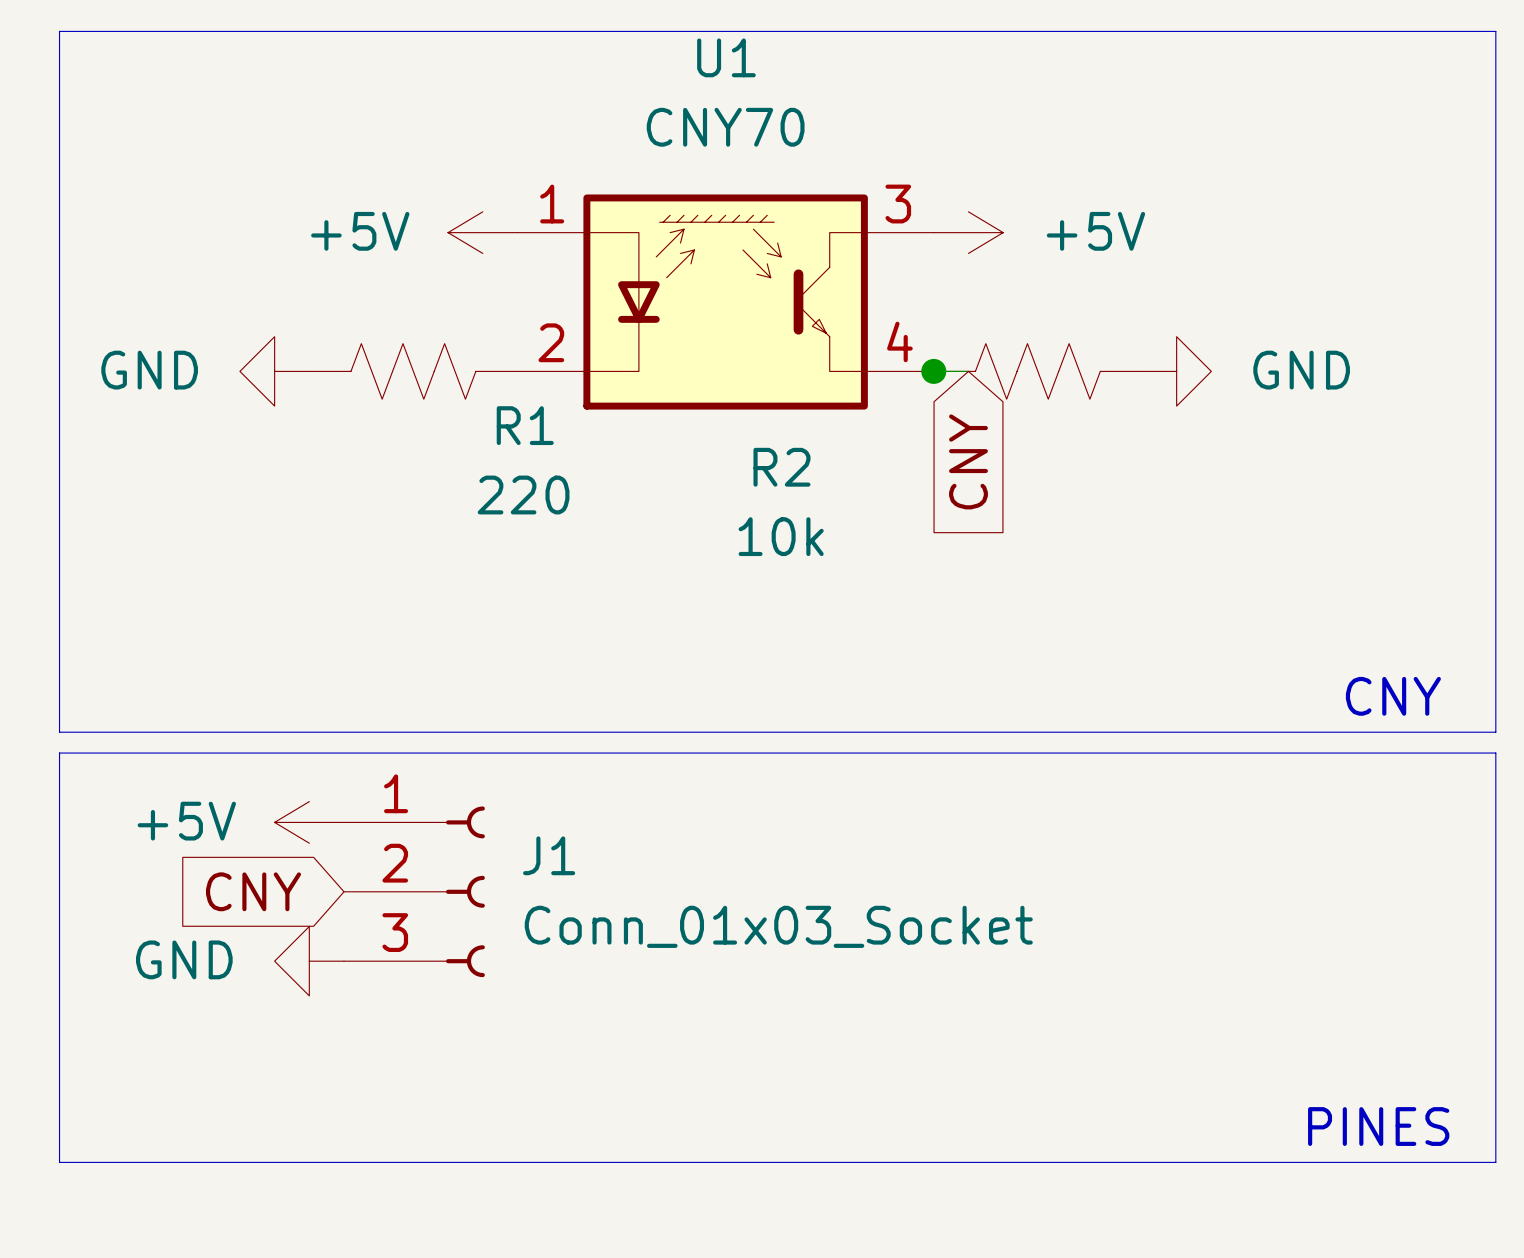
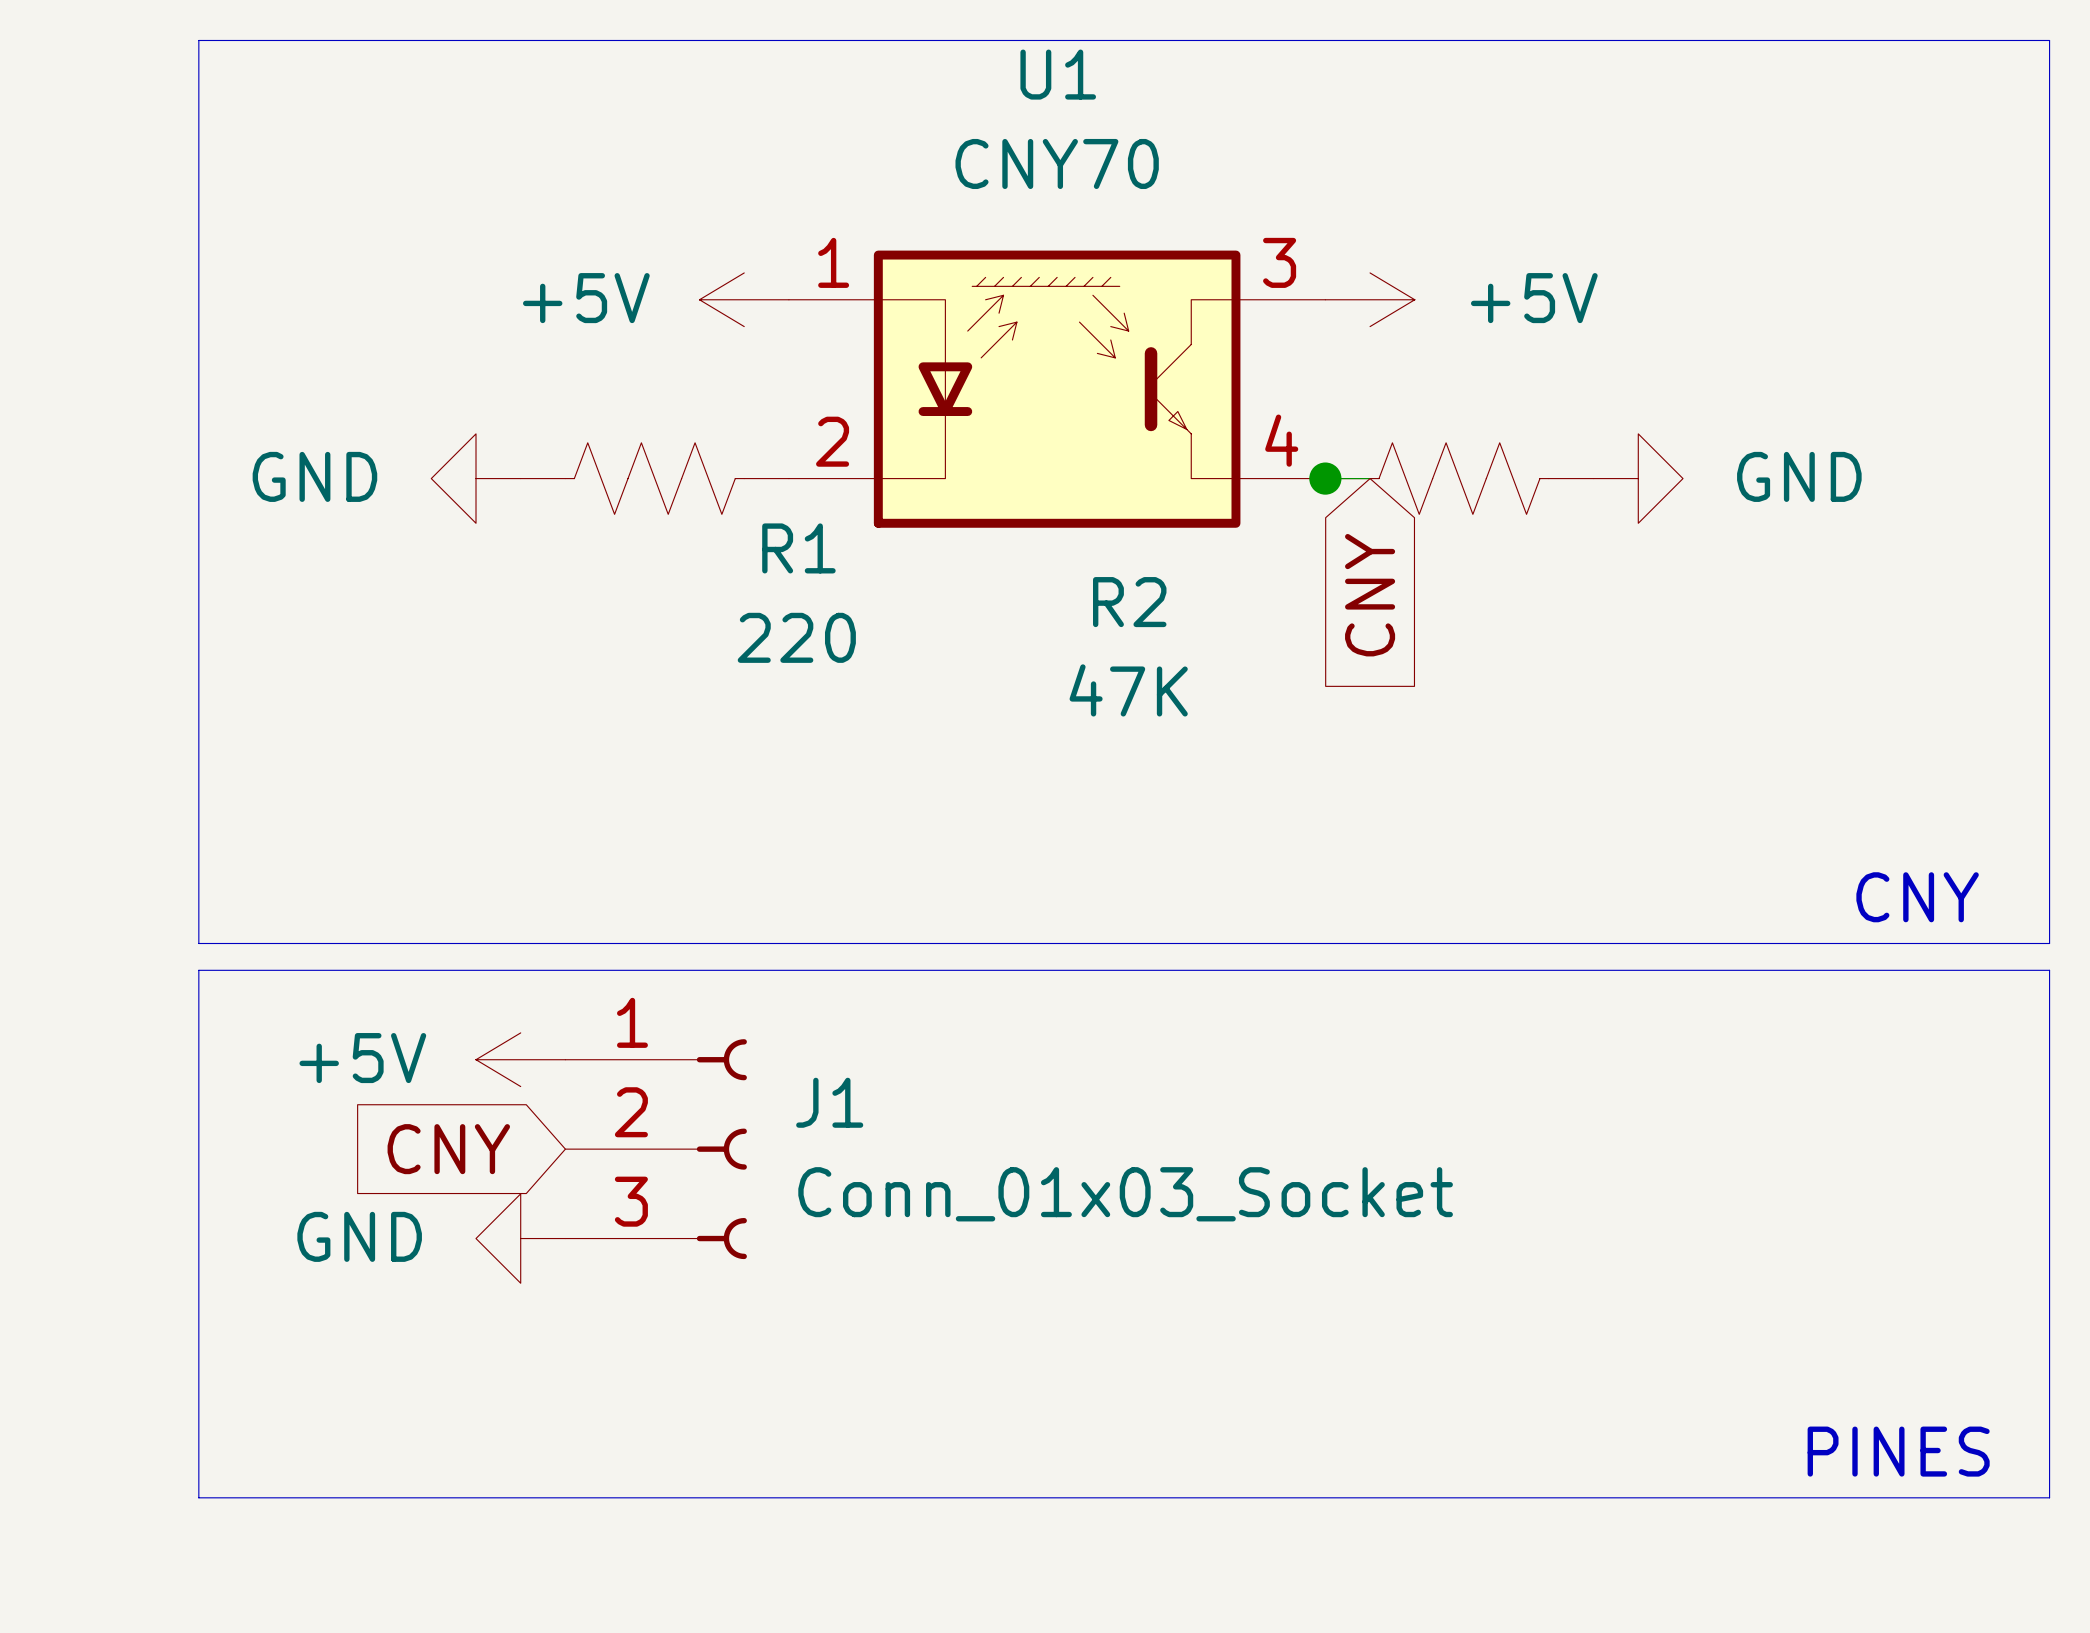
R2 value: 10k (781, 536) -> 47K (1128, 690)

